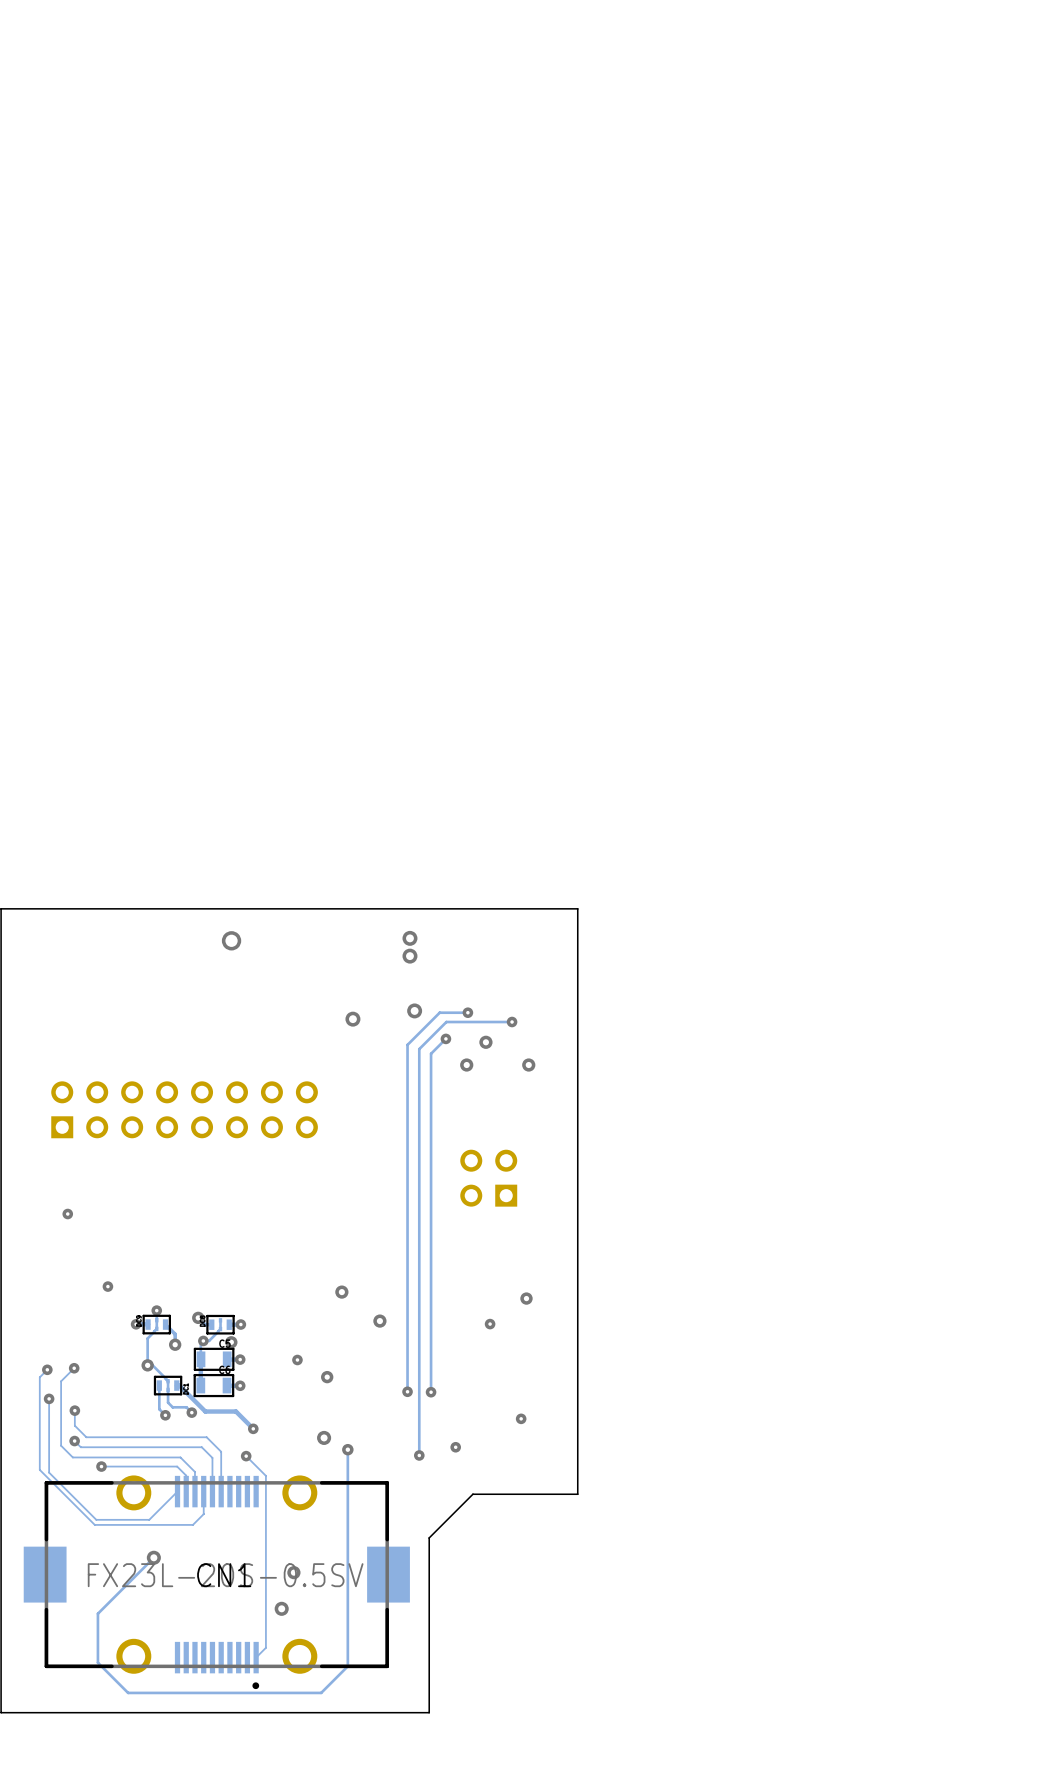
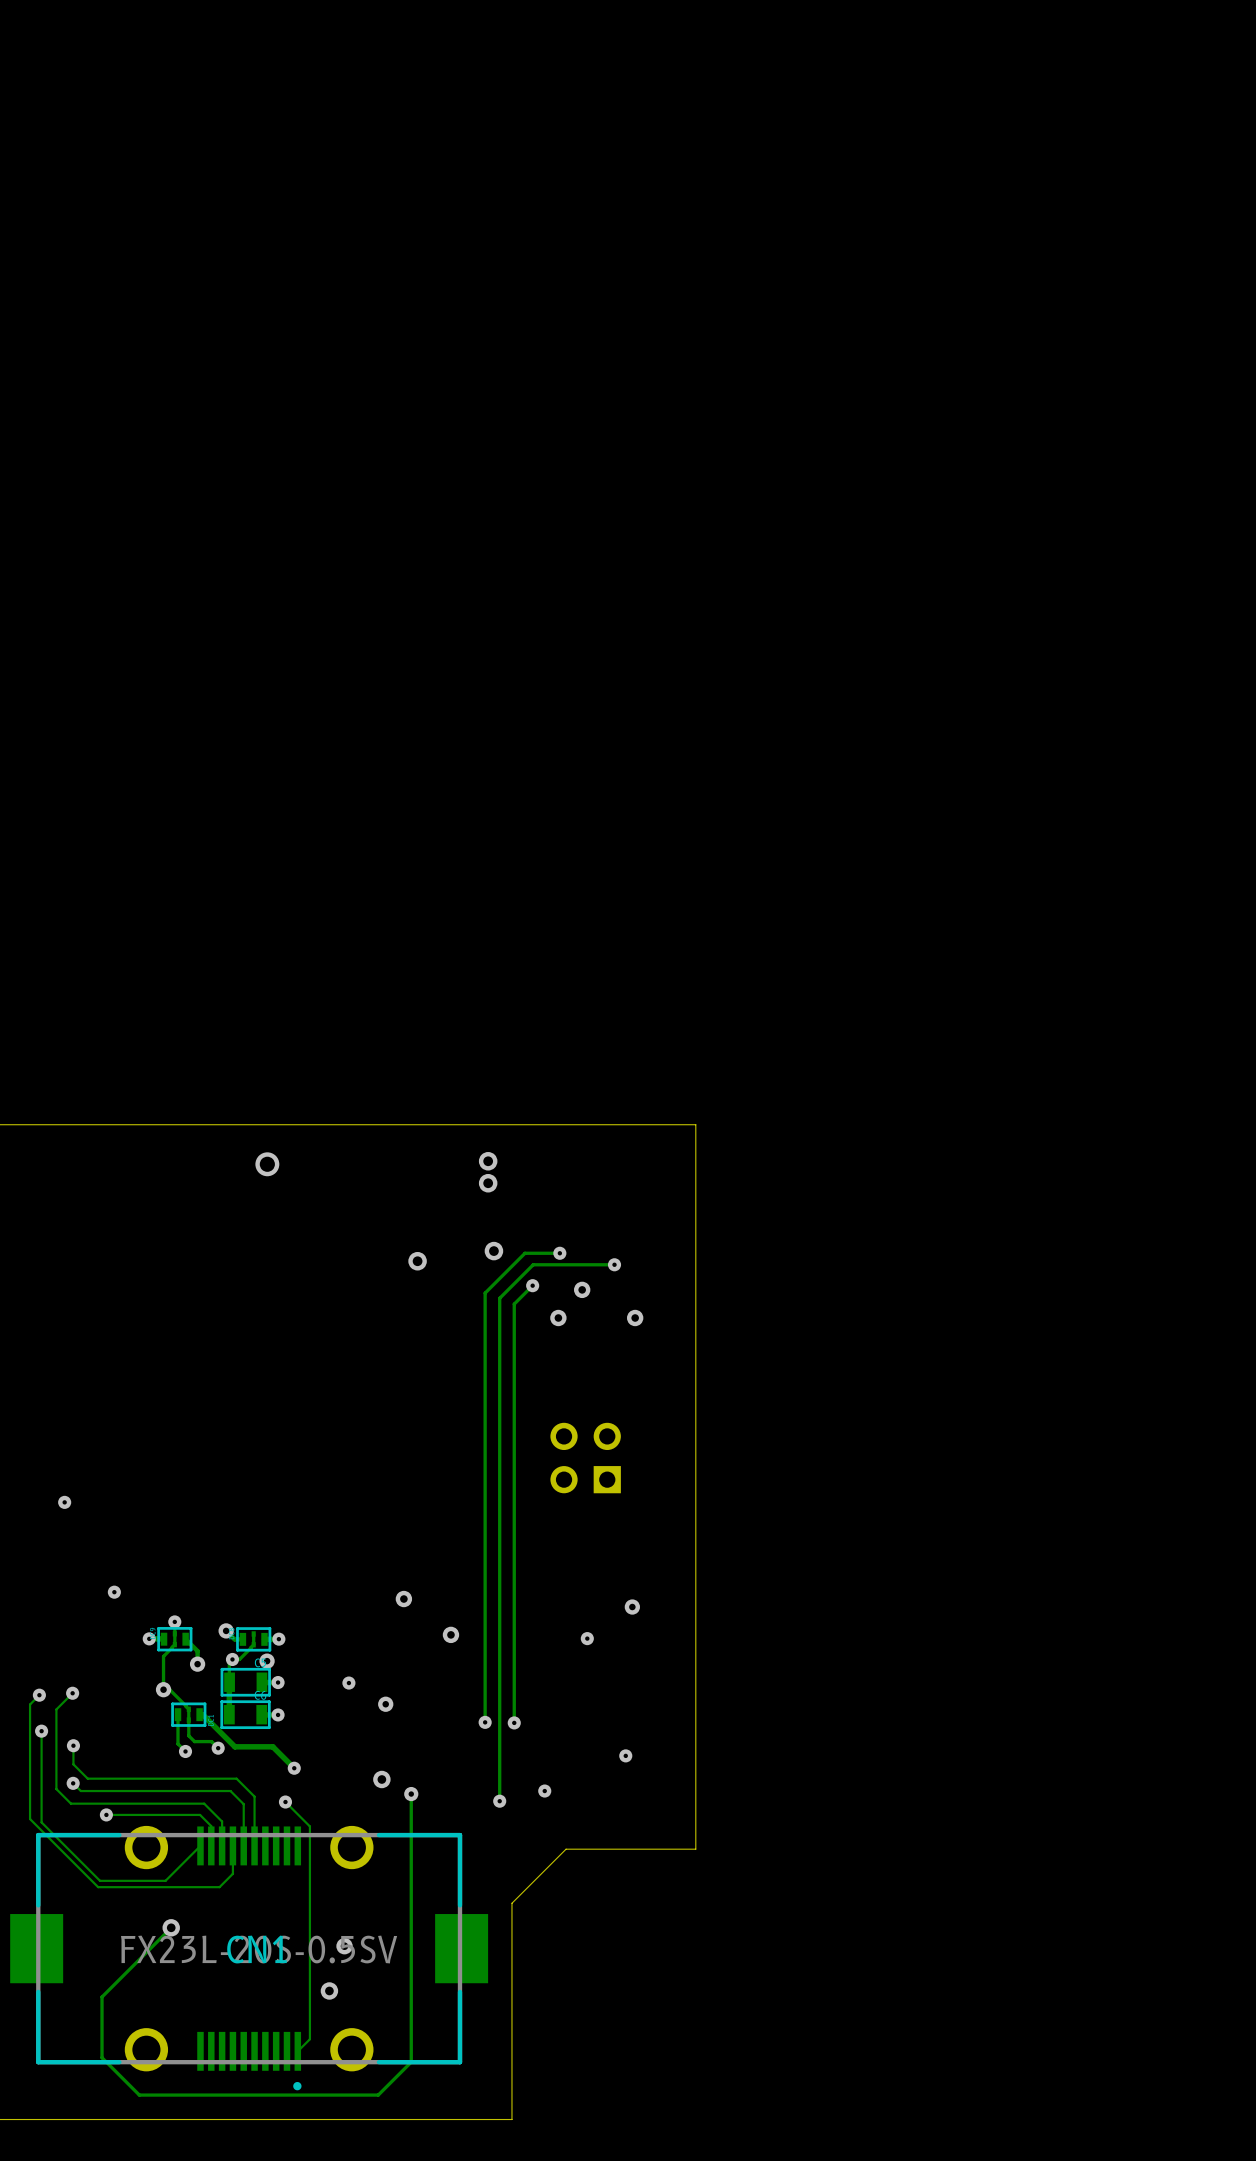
part: (184, 1109) -> none

